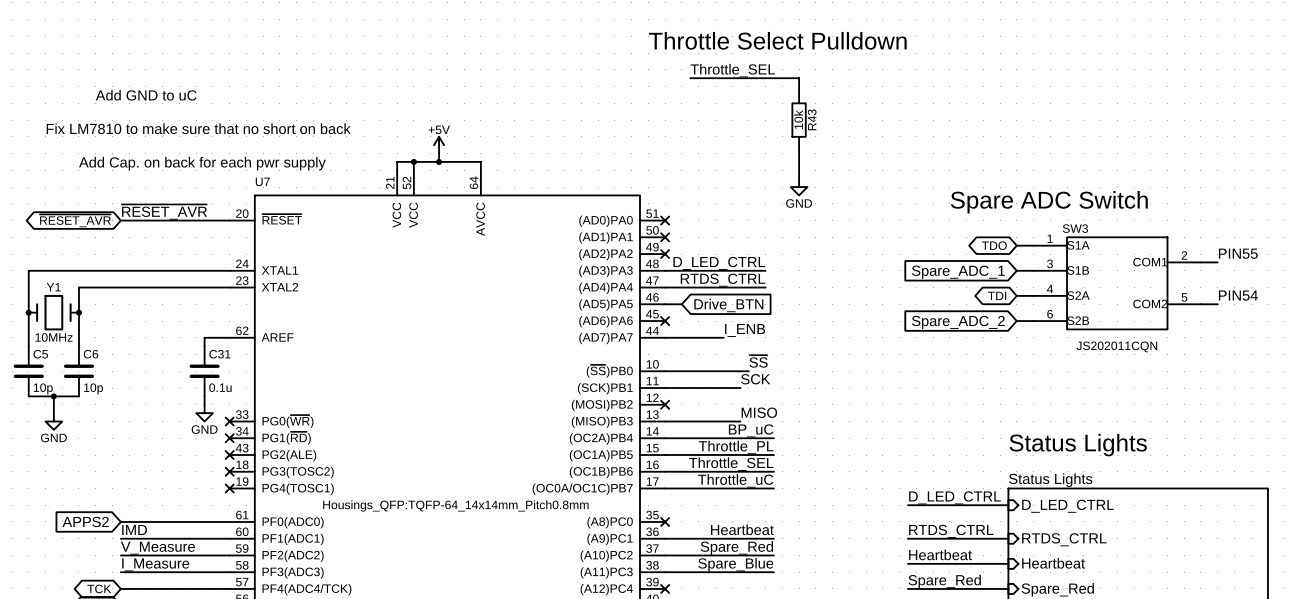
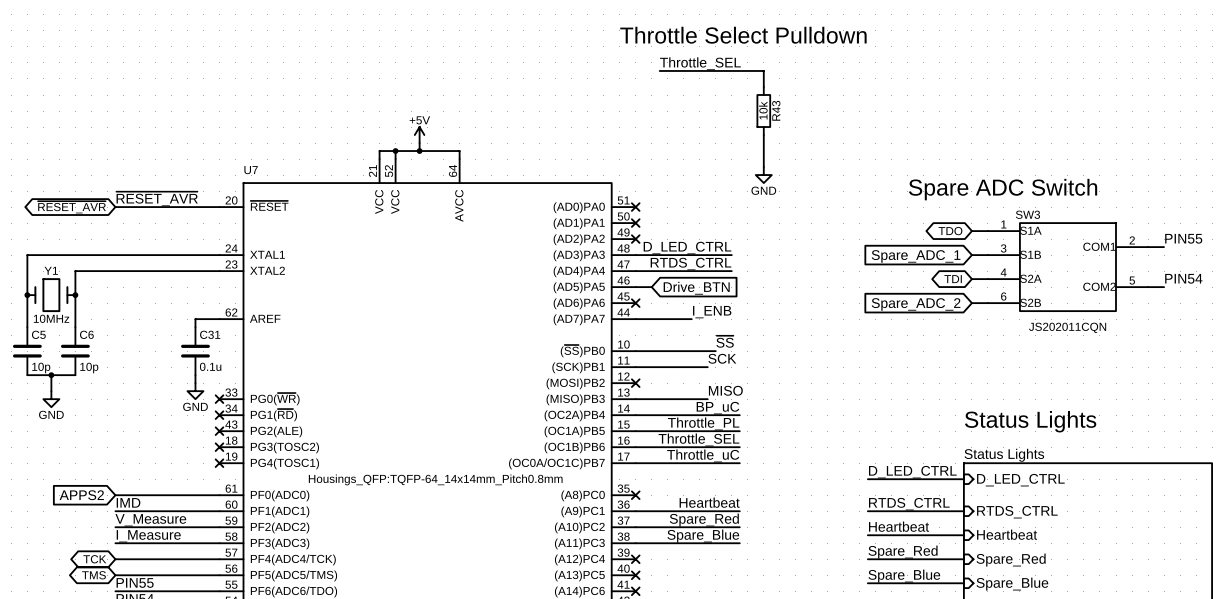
text: Add GND to uC (146, 95) -> none
text: Fix LM7810 to make sure that no short on back (198, 128) -> none
text: Add Cap. on back for each pwr supply (202, 163) -> none

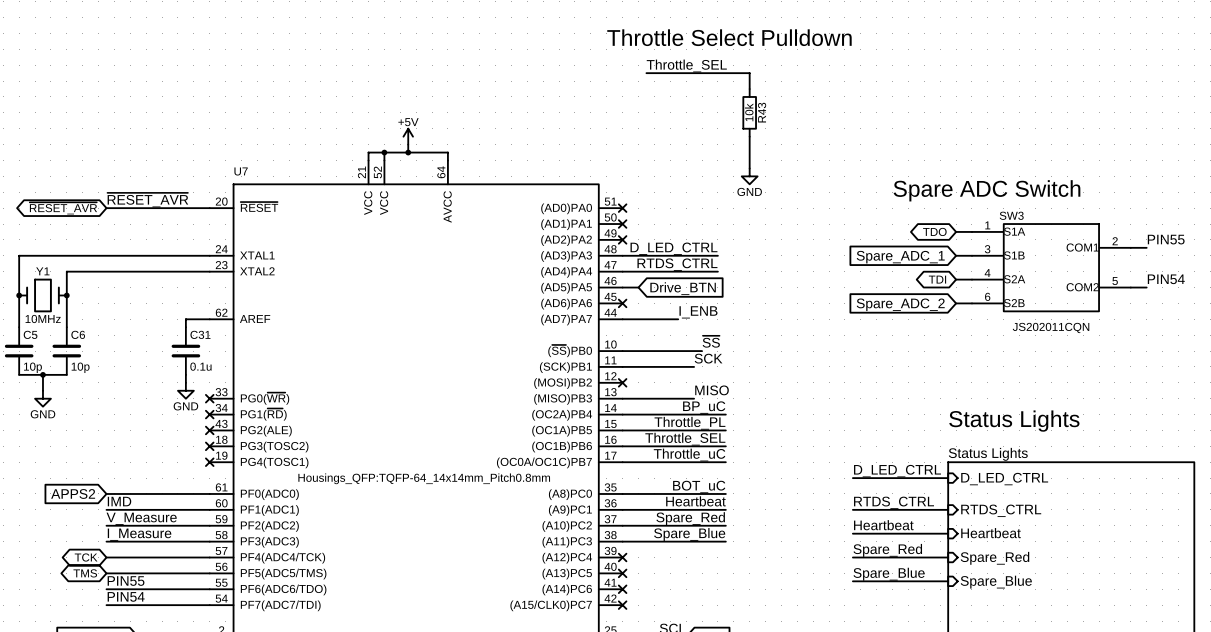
label: none -> BOT_uC (699, 486)
wire: none -> (622, 493) (725, 493)
no-connect mark: (635, 495) -> none

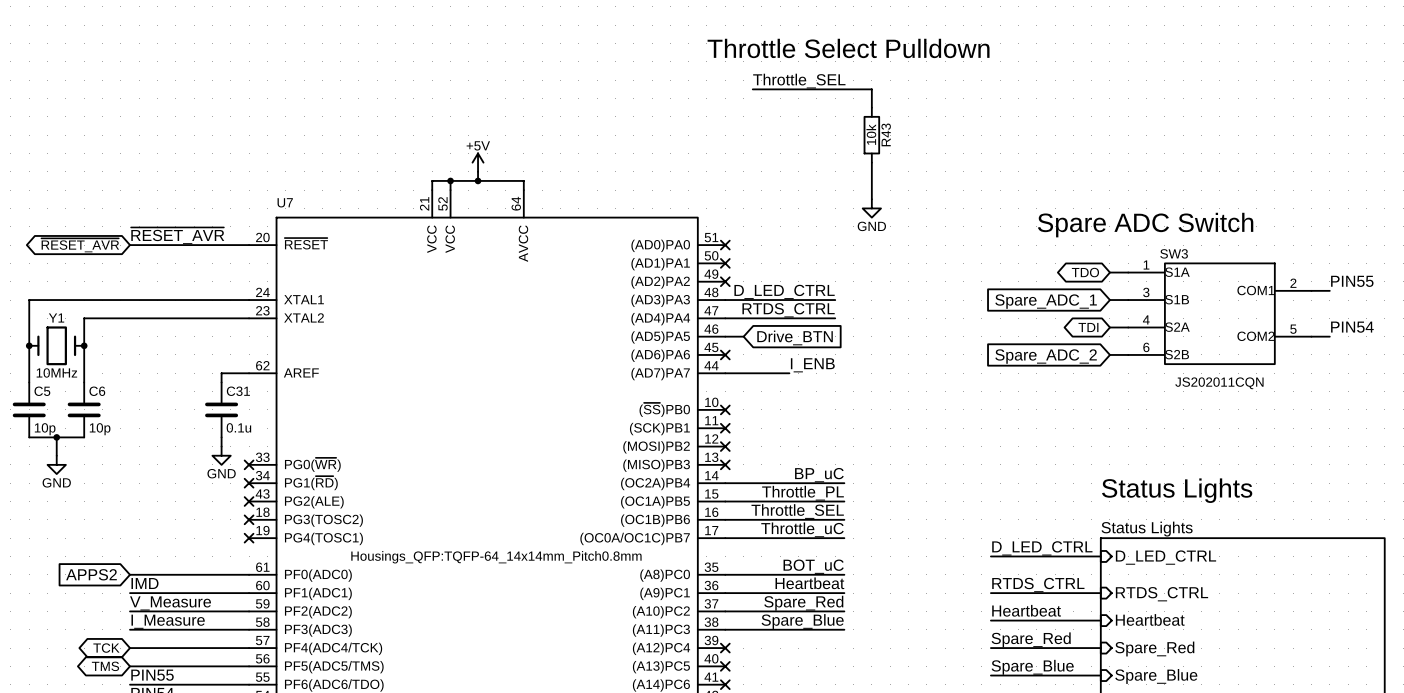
label: ~{SS} (711, 341) -> none
wire: (622, 351) (702, 351) -> none
no-connect mark: none -> (725, 409)
label: SCK (708, 358) -> none
wire: (622, 366) (694, 366) -> none
no-connect mark: none -> (725, 428)
label: MISO (712, 390) -> none
wire: (622, 398) (694, 398) -> none
no-connect mark: none -> (725, 464)

